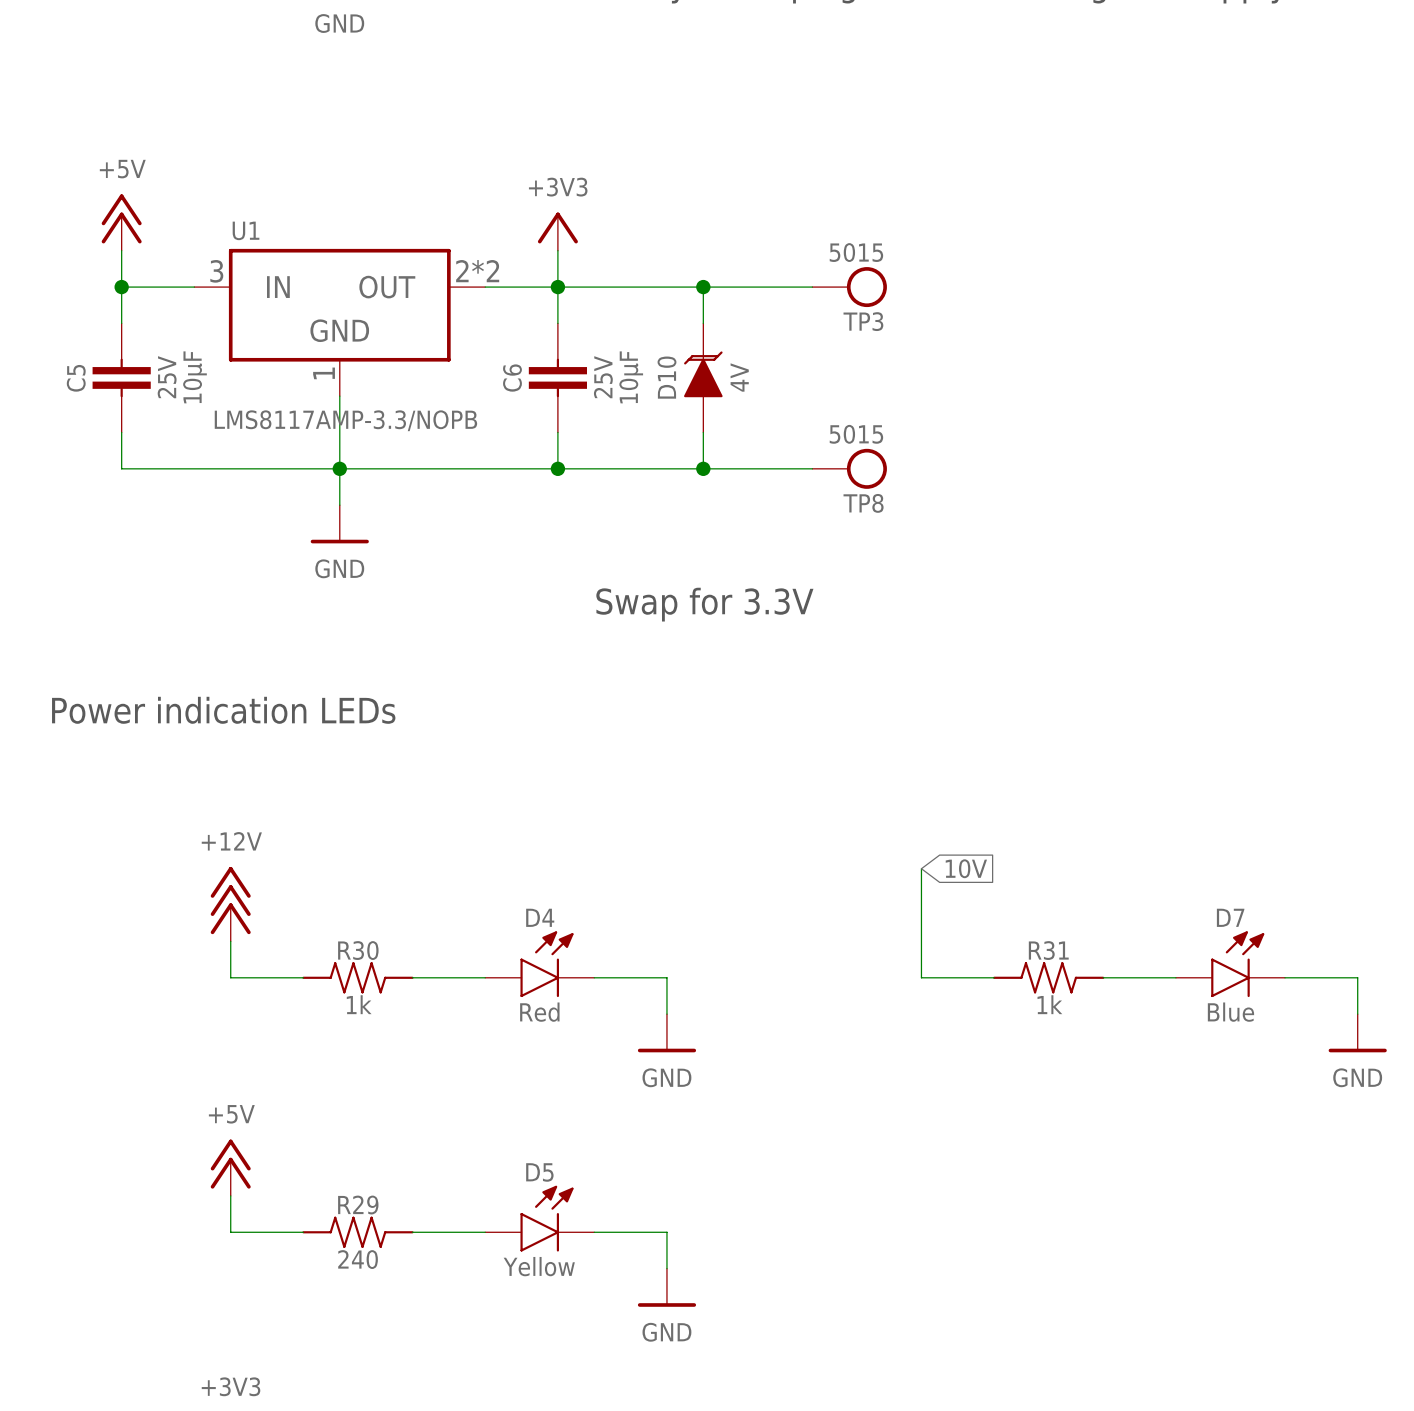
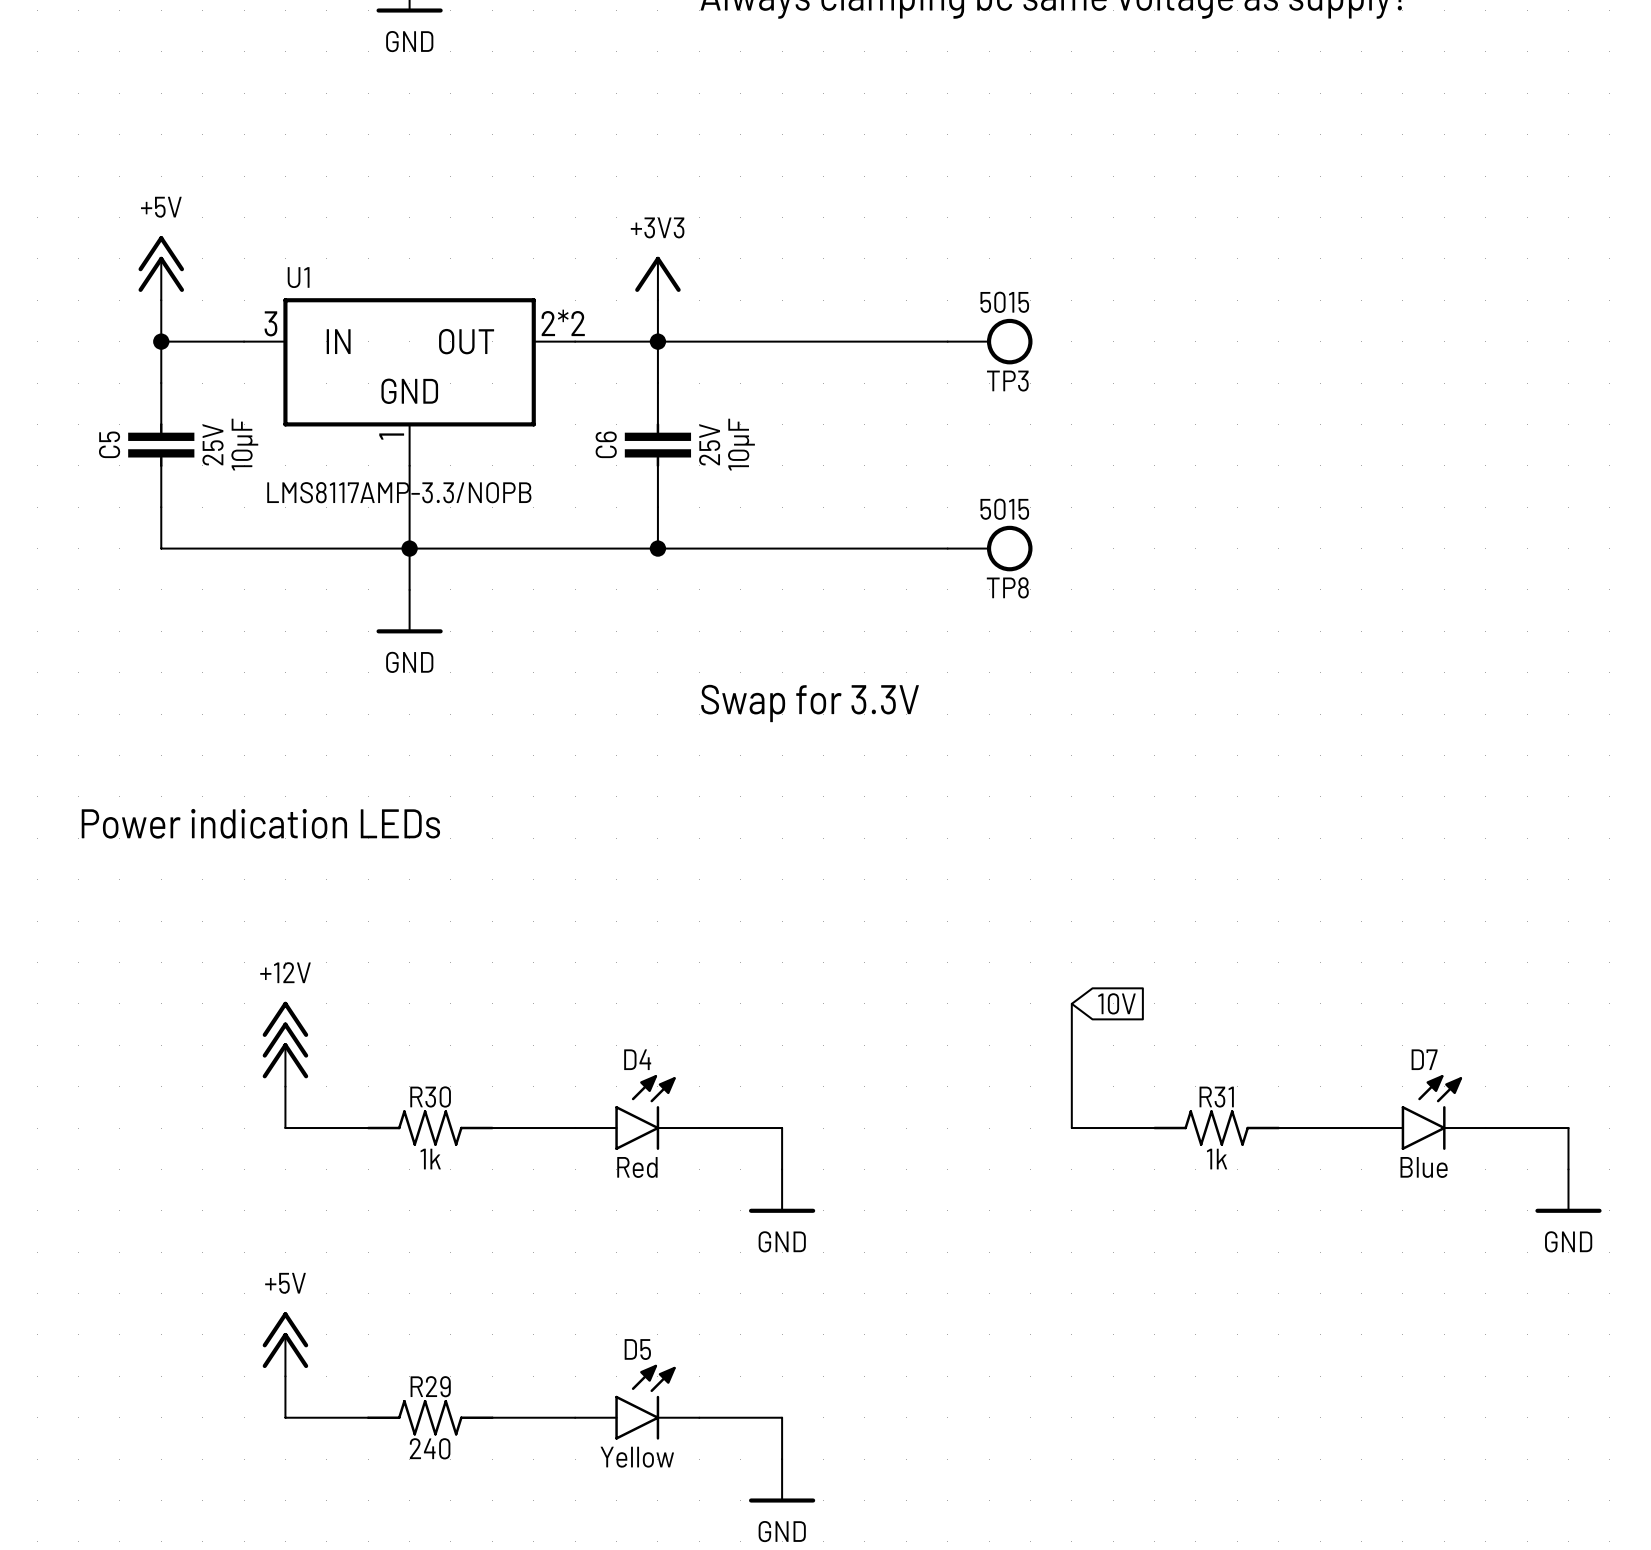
wire: (703, 287) (703, 323) -> none
junction: (703, 287) -> none
D10: (703, 377) -> none
wire: (703, 432) (703, 468) -> none
junction: (703, 468) -> none

